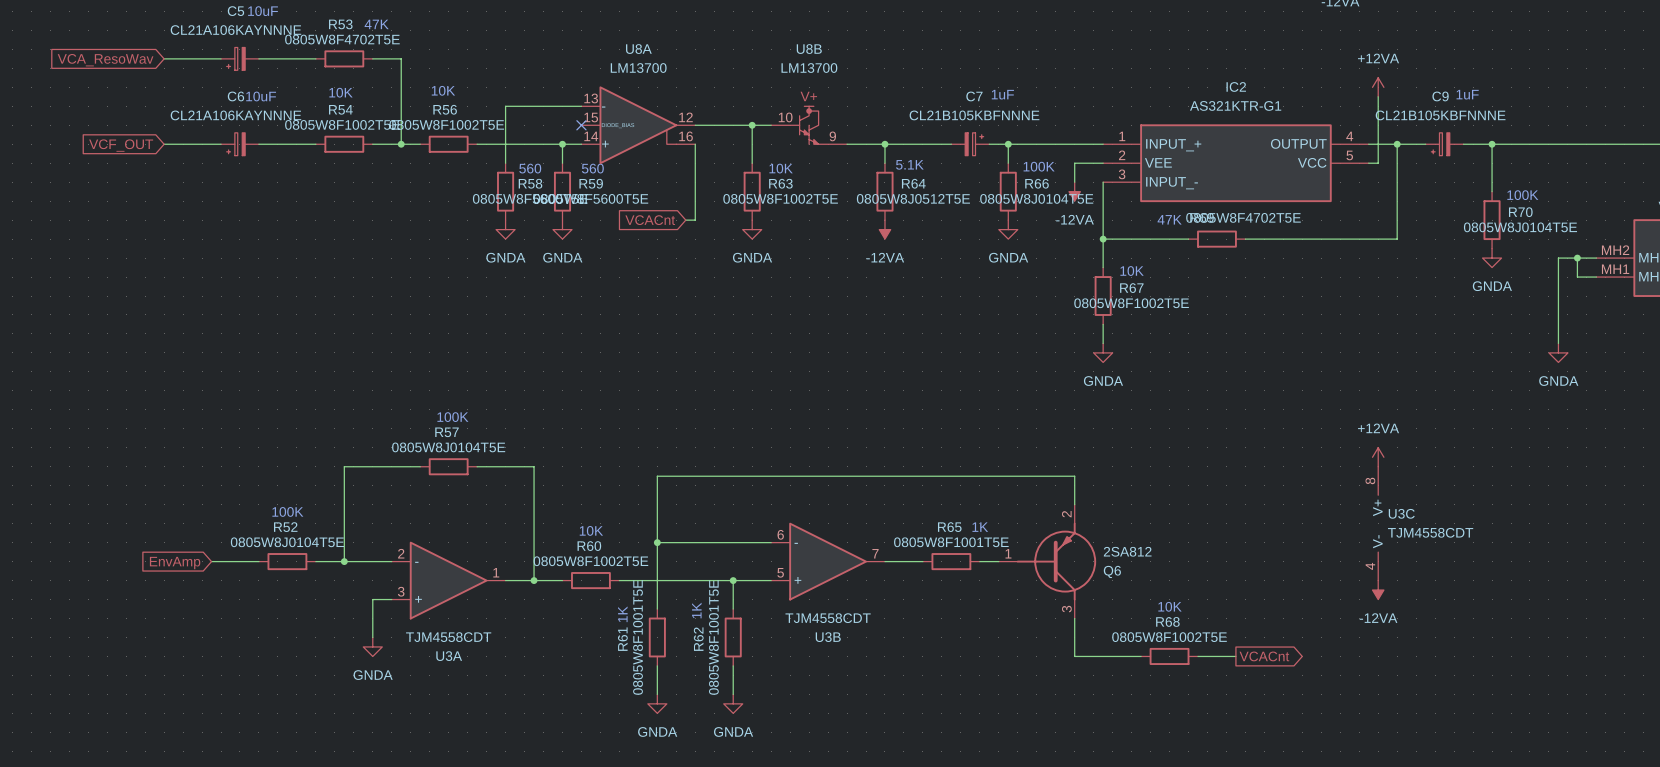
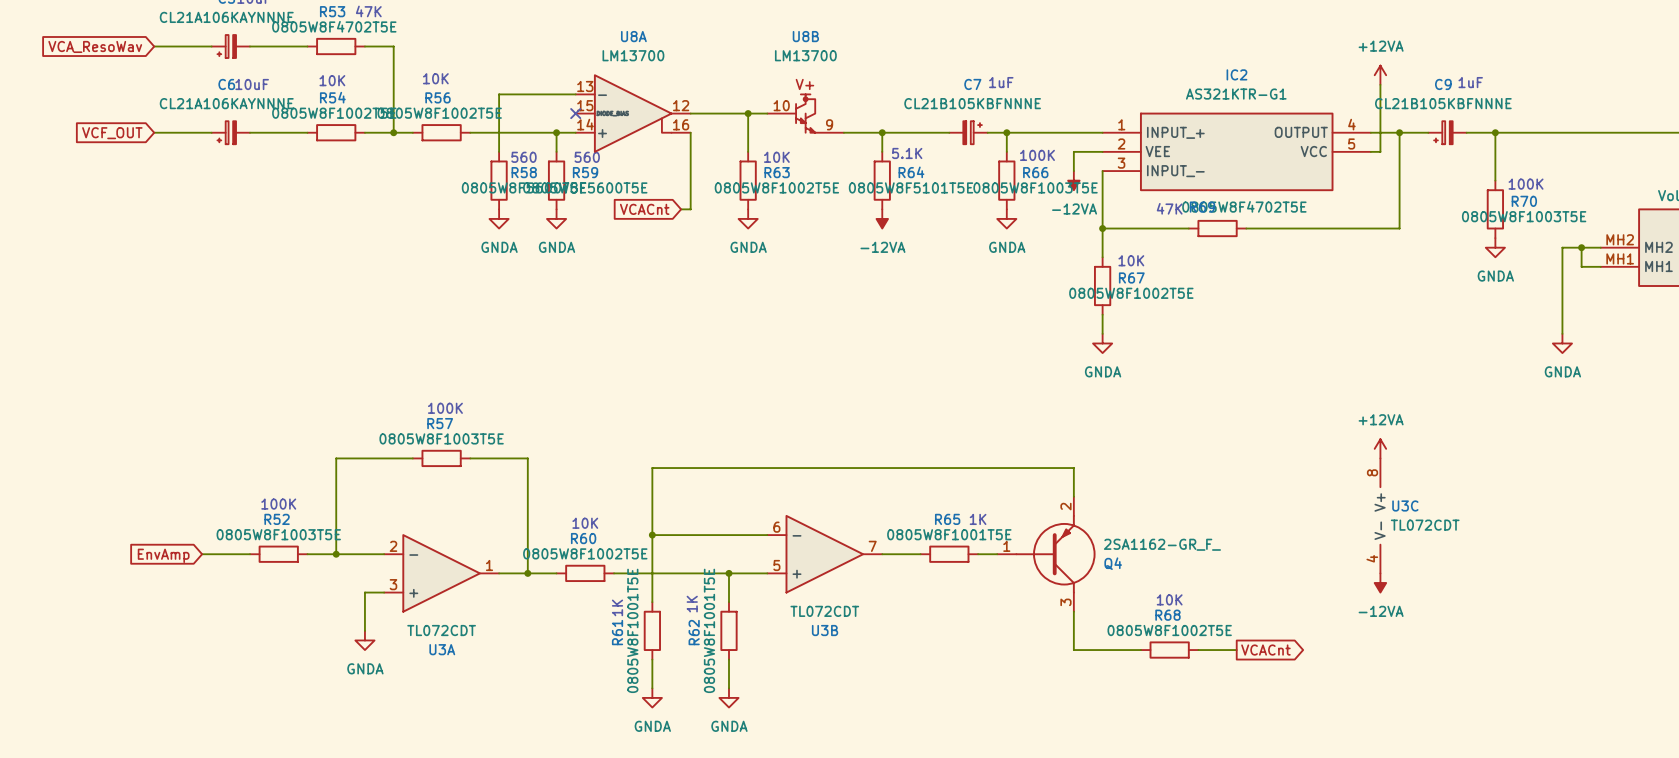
R64 value: 0805W8J0512T5E (913, 198) -> 0805W8F5101T5E (911, 187)
R66 value: 0805W8J0104T5E (1036, 198) -> 0805W8F1003T5E (1035, 187)
R70 value: 0805W8J0104T5E (1520, 227) -> 0805W8F1003T5E (1524, 216)
R57 value: 0805W8J0104T5E (448, 447) -> 0805W8F1003T5E (441, 438)
U3C value: TJM4558CDT (1430, 532) -> TL072CDT (1425, 525)
R52 value: 0805W8J0104T5E (287, 542) -> 0805W8F1003T5E (278, 534)
Q6 value: 2SA812 (1127, 551) -> 2SA1162-GR_F_ (1162, 544)
Q6 name: Q6 (1112, 571) -> Q4 (1113, 563)
U3B value: TJM4558CDT (828, 618) -> TL072CDT (824, 611)
U3A value: TJM4558CDT (448, 637) -> TL072CDT (441, 630)

